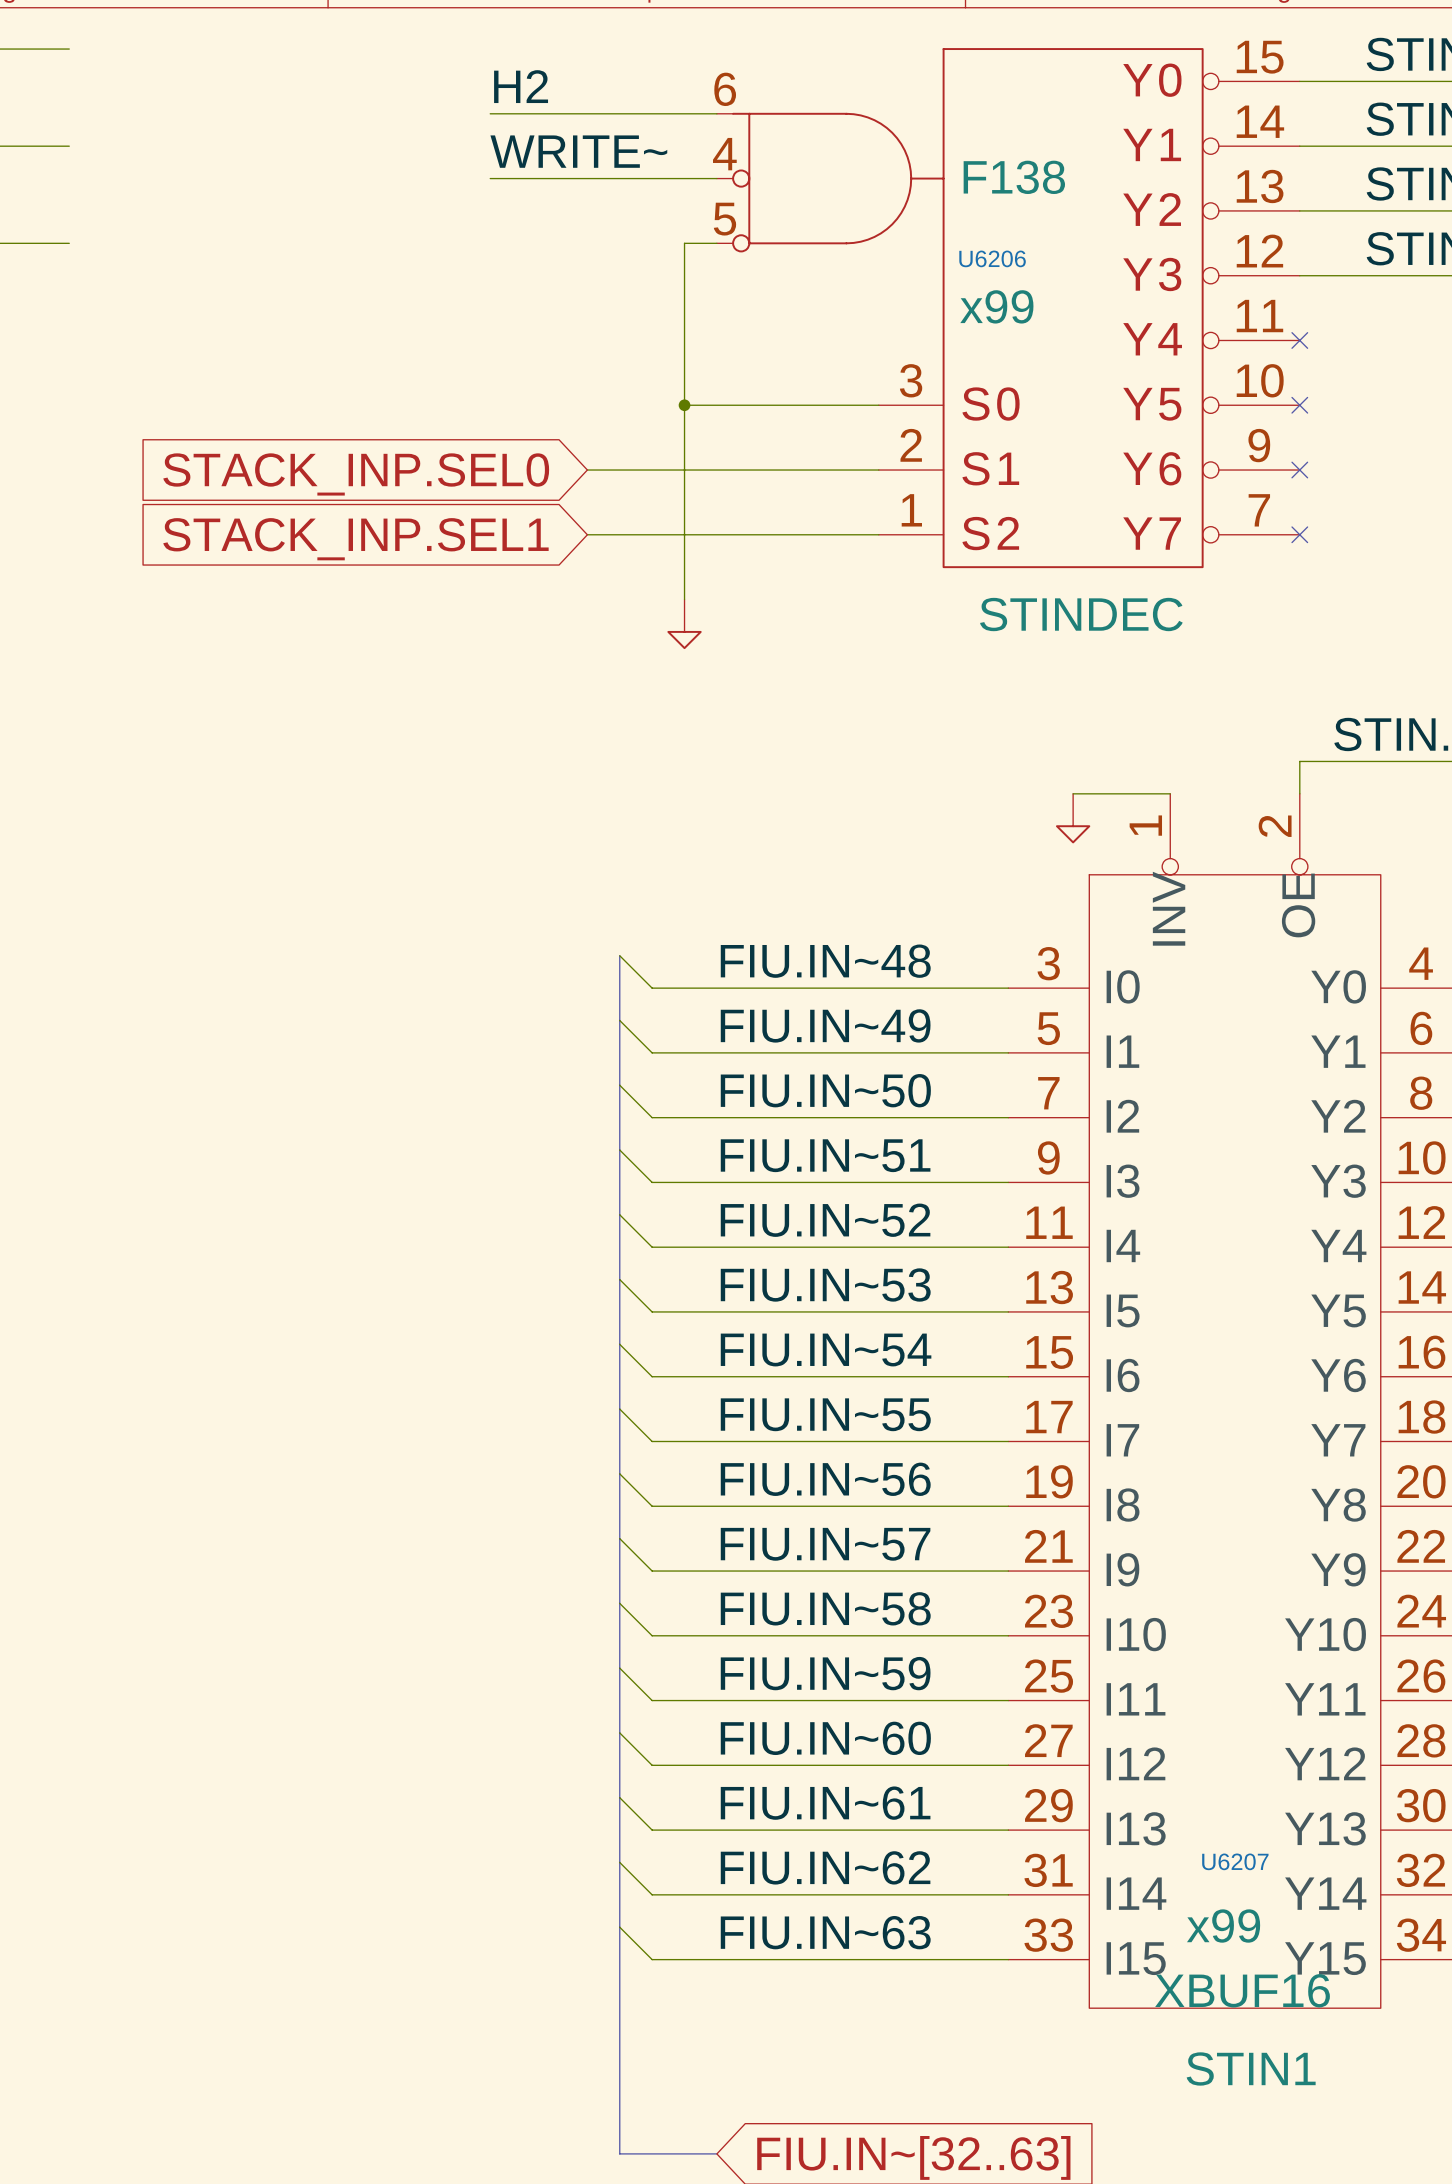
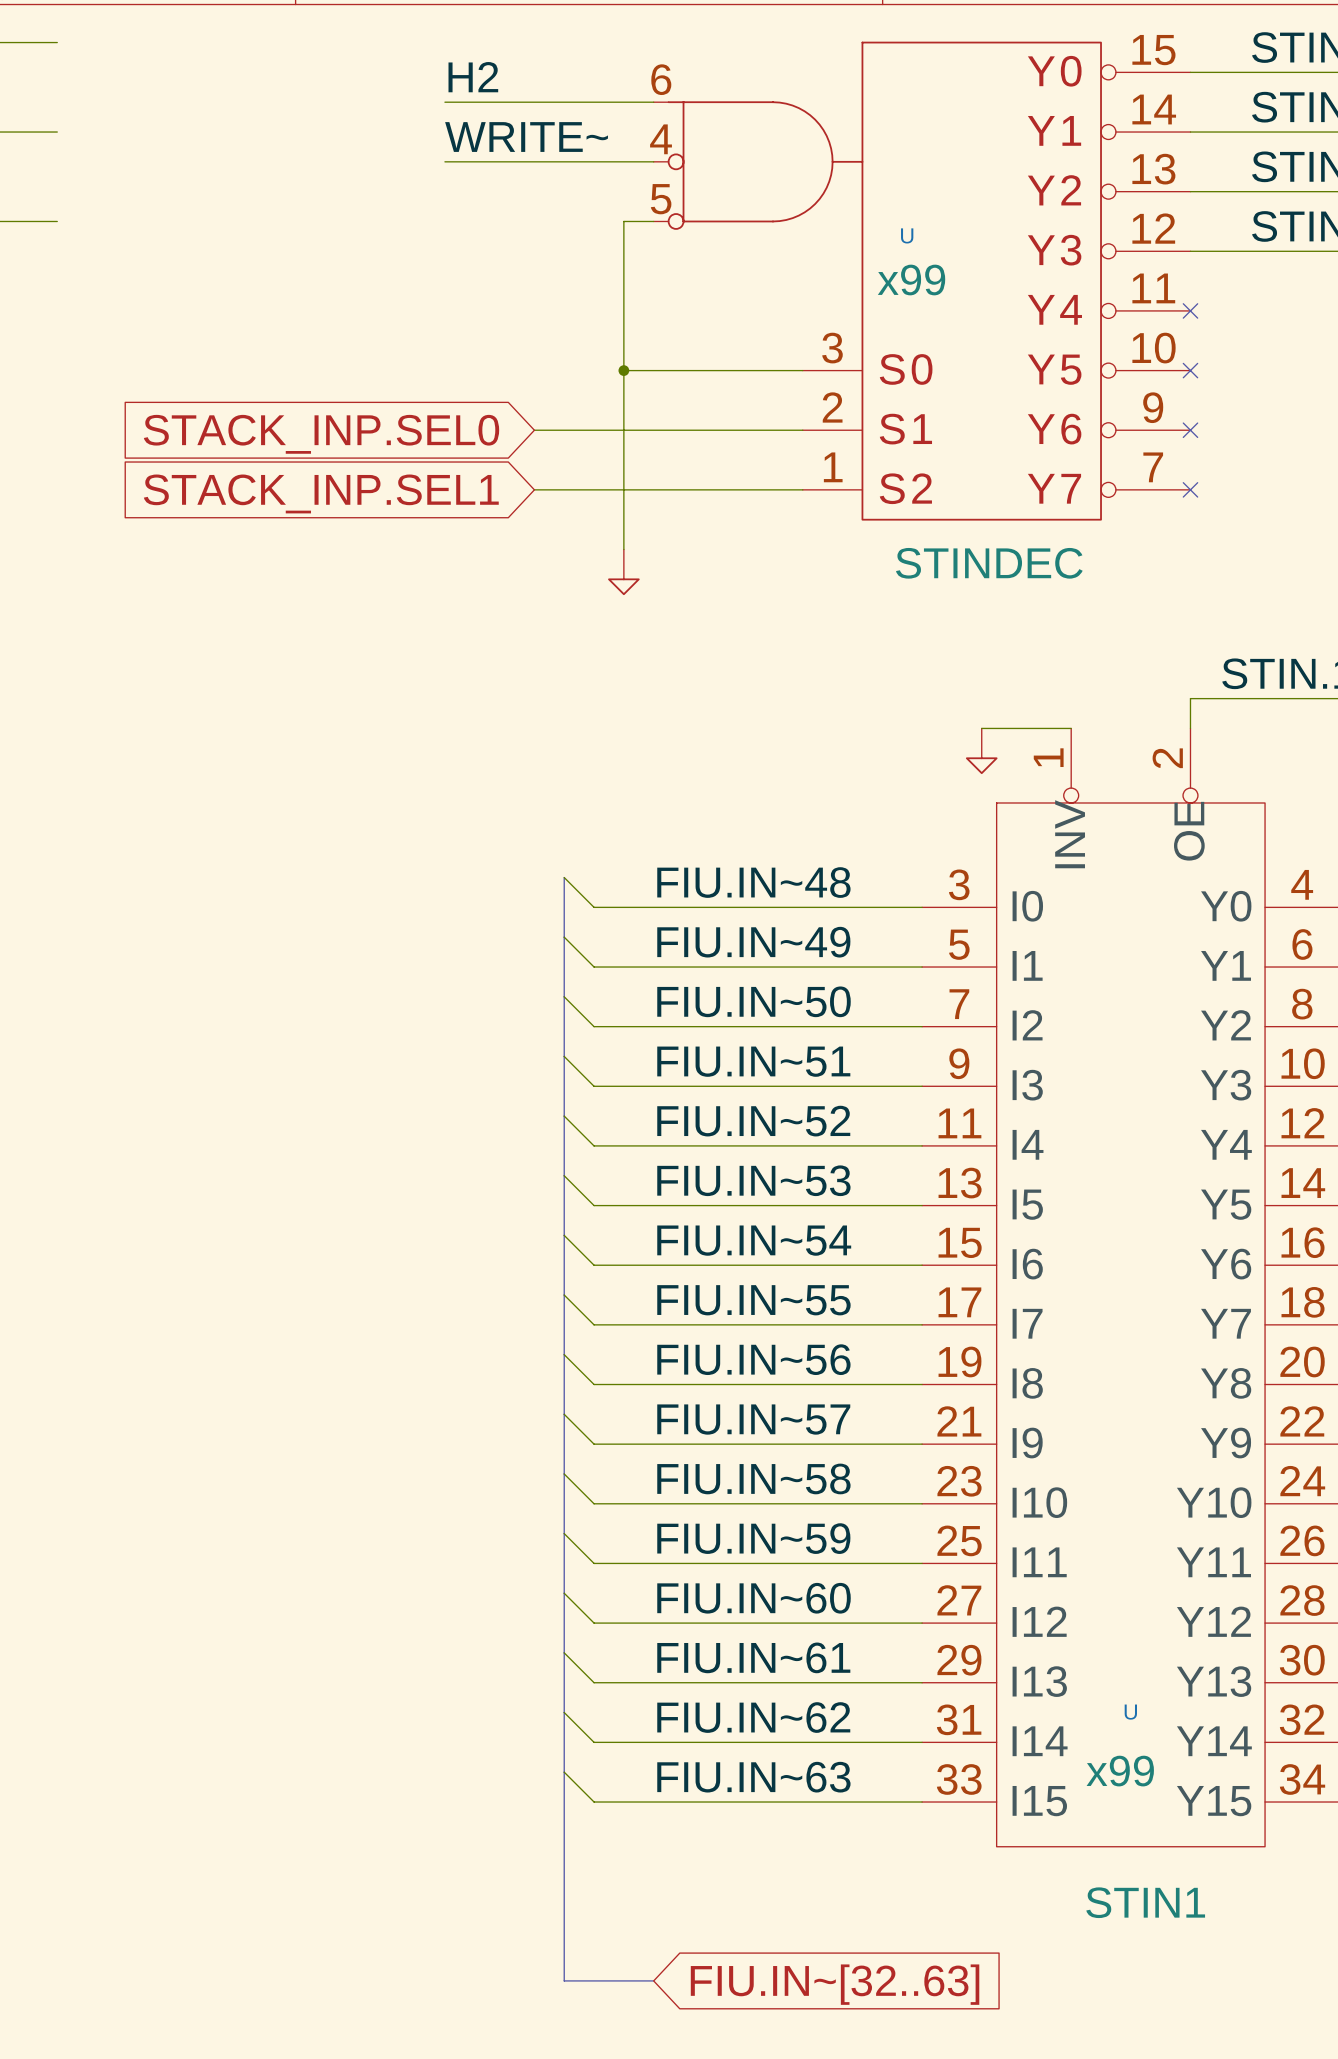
U6206 value: F138 (1014, 177) -> none
U6206 name: U6206 (992, 258) -> U (907, 235)
U6207 name: U6207 (1235, 1861) -> U (1130, 1712)
U6207 value: XBUF16 (1242, 1990) -> none

